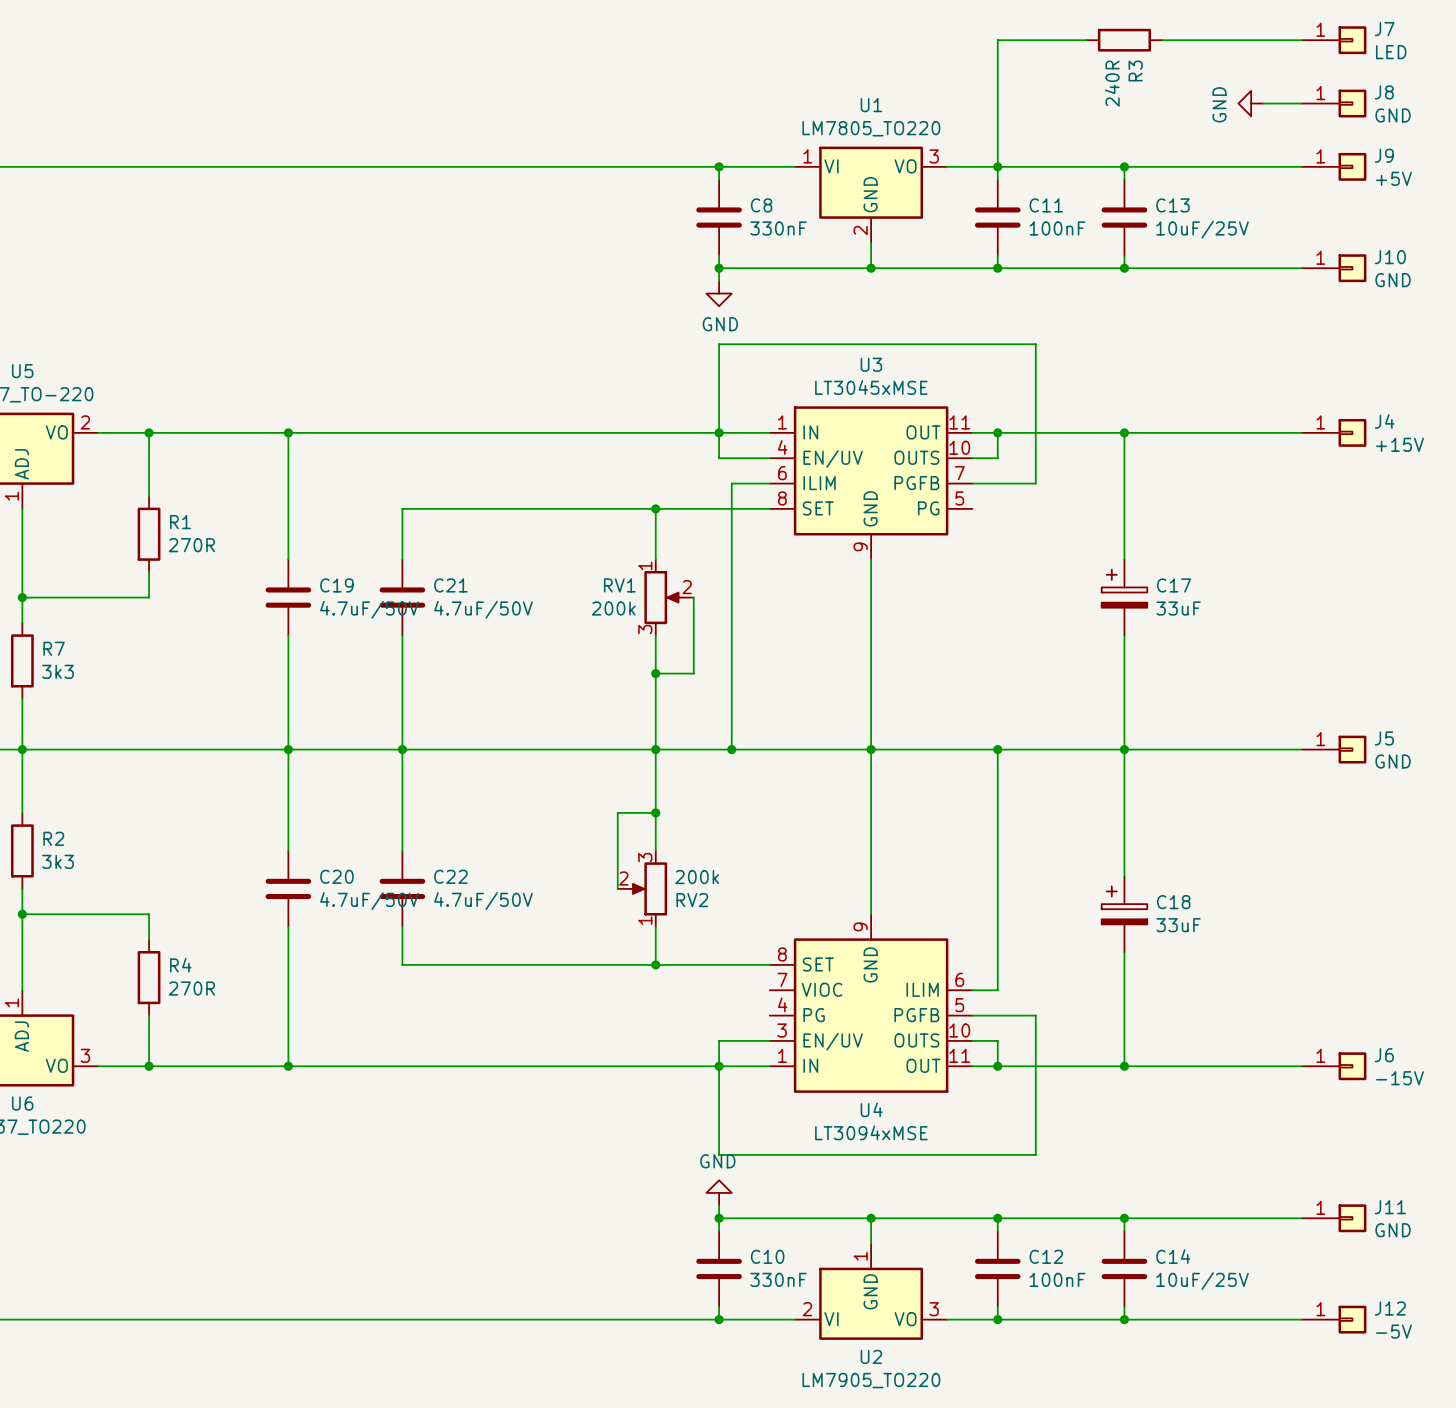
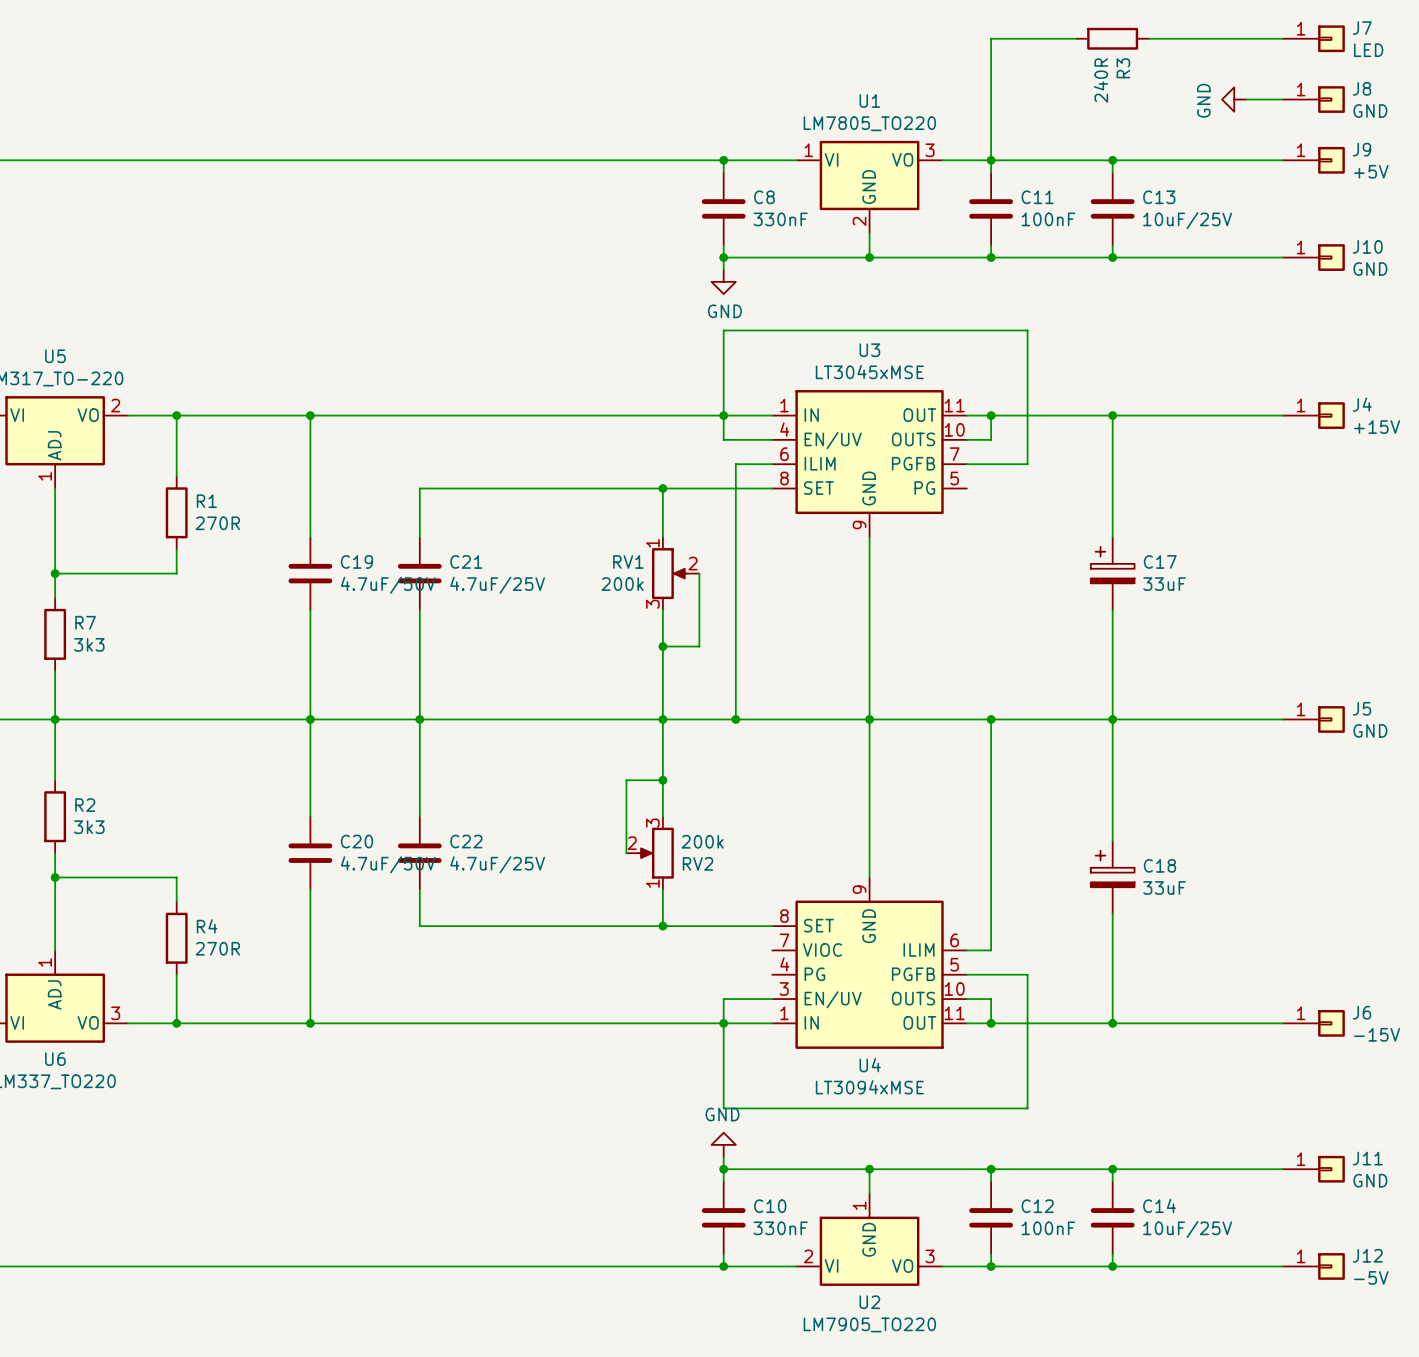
C21 value: 4.7uF/50V (483, 609) -> 4.7uF/25V (497, 585)
C22 value: 4.7uF/50V (483, 901) -> 4.7uF/25V (497, 864)

